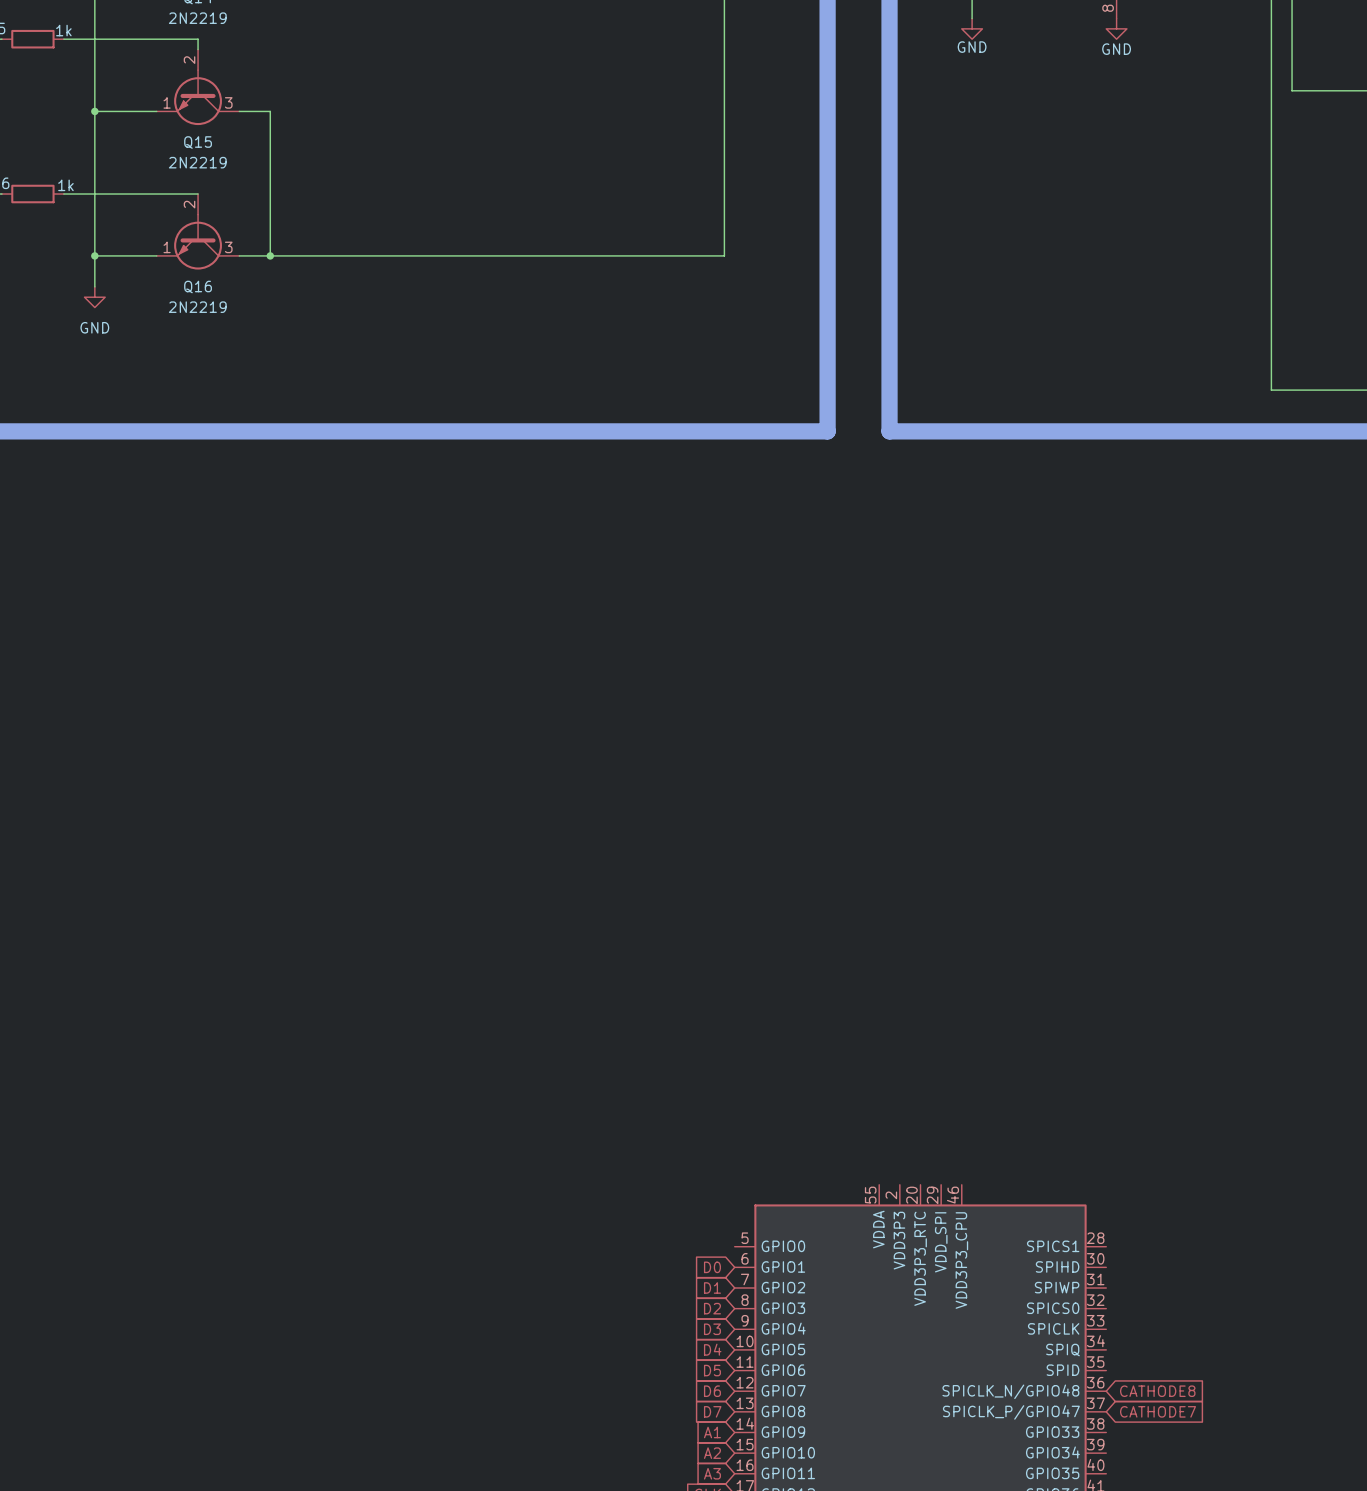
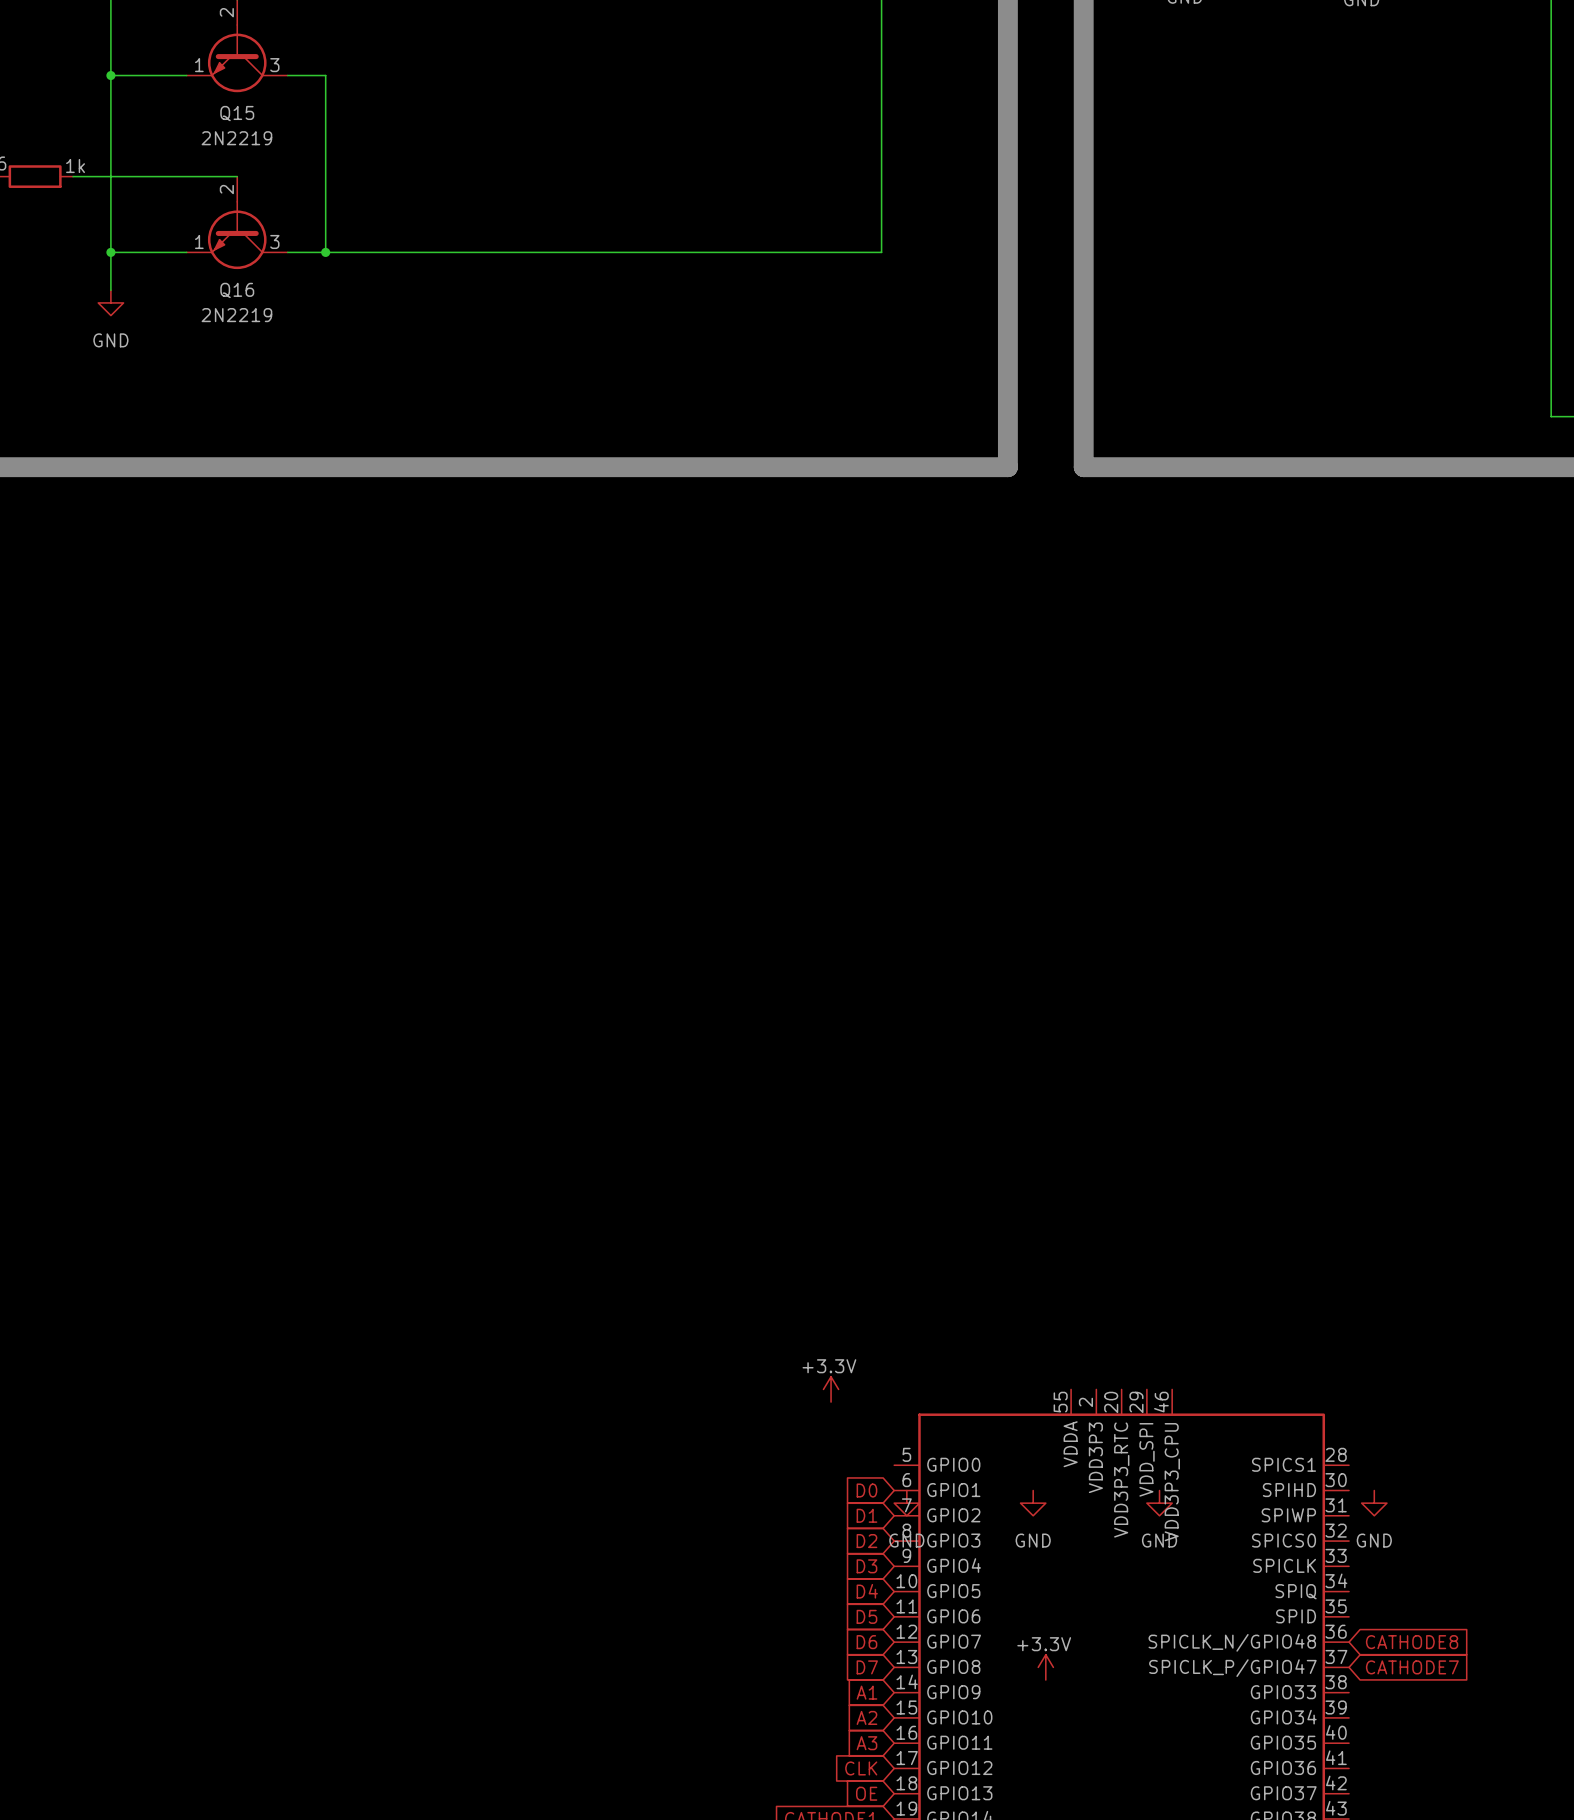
power symbol: none -> +3.3V (831, 1389)
power symbol: none -> GND (906, 1503)
power symbol: none -> GND (1033, 1503)
power symbol: none -> GND (1159, 1503)
power symbol: none -> GND (1374, 1503)
power symbol: none -> +3.3V (1045, 1667)

